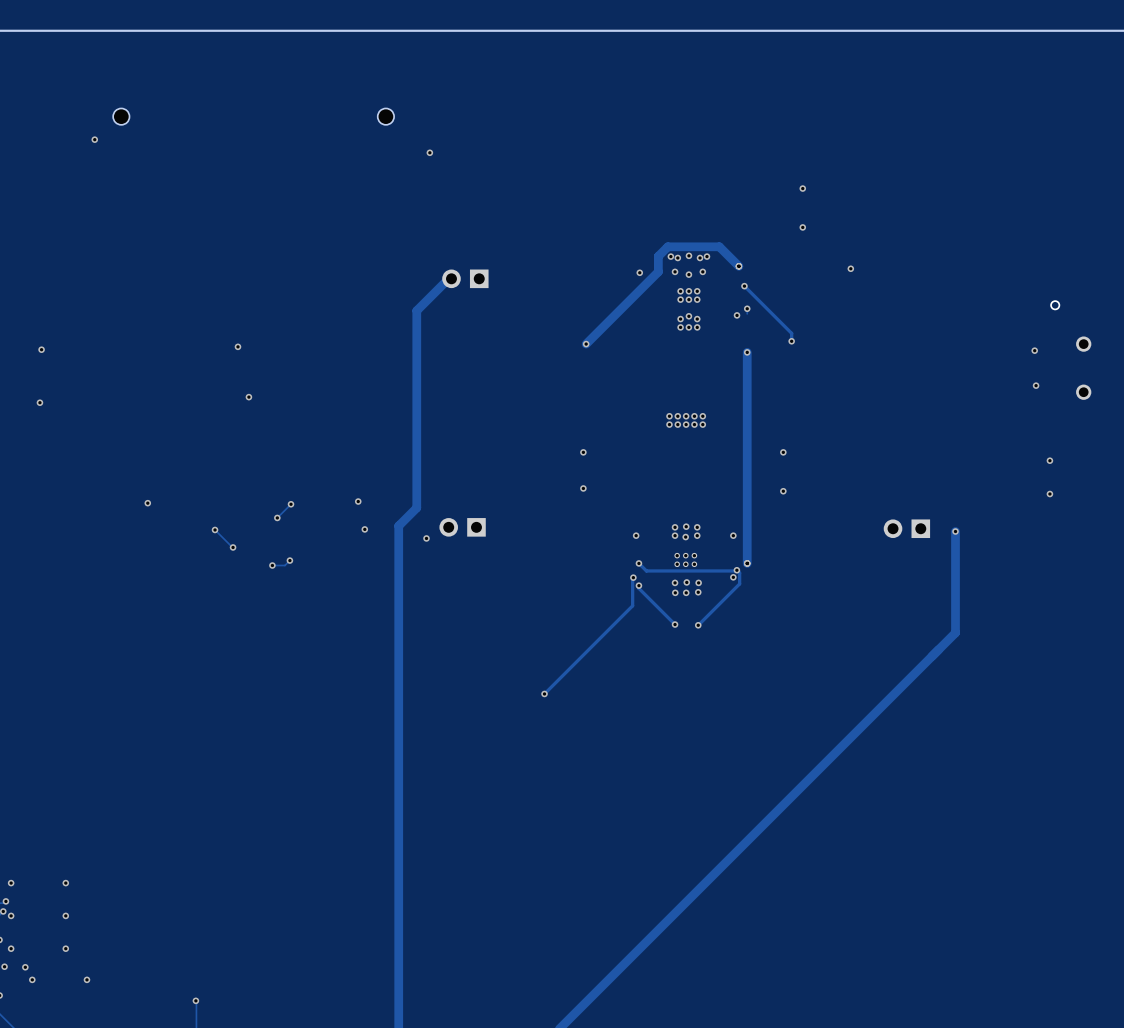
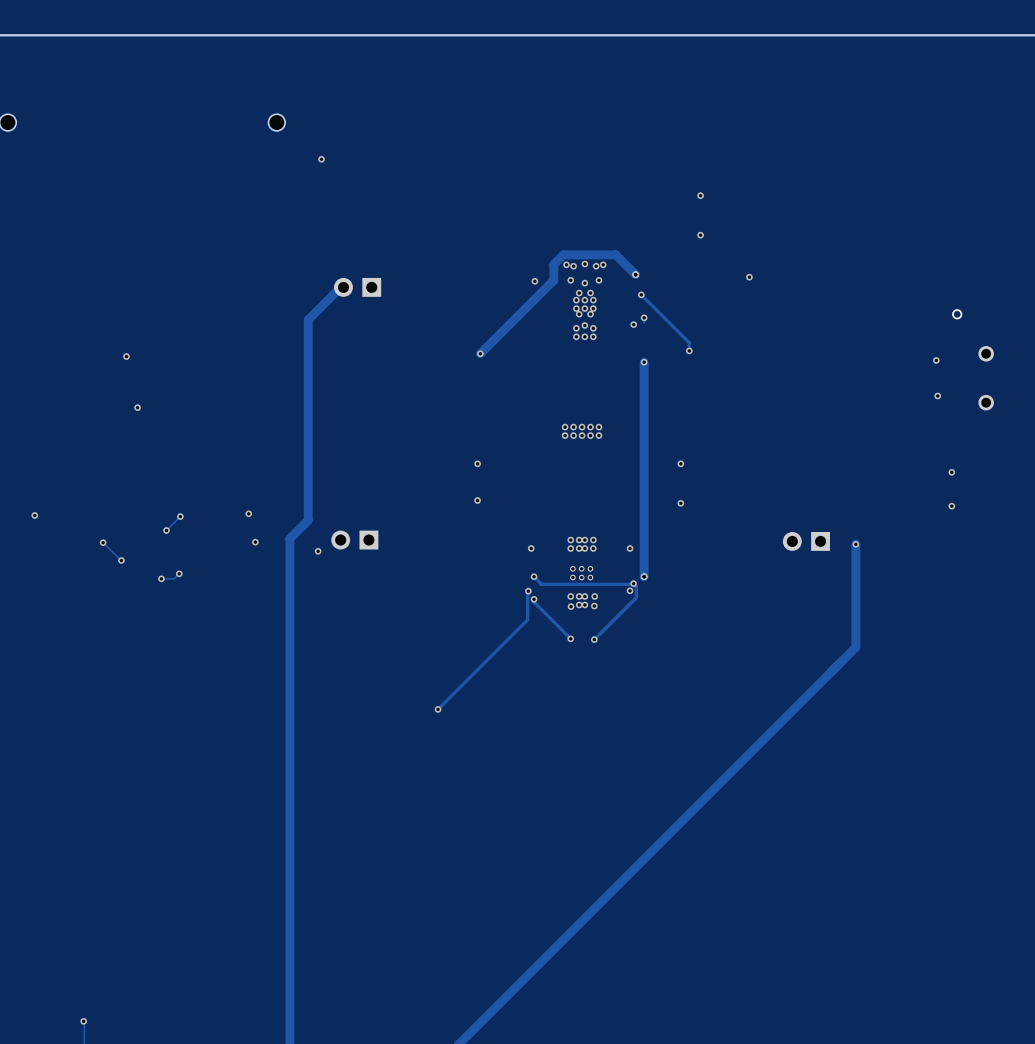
via: none -> (579, 293)
via: none -> (590, 293)
via: none -> (579, 314)
via: none -> (590, 314)
via: (686, 526) -> none
via: none -> (579, 540)
via: none -> (584, 540)
via: none -> (579, 548)
via: none -> (584, 548)
via: (685, 537) -> none
via: none -> (579, 596)
via: (686, 582) -> none
via: none -> (584, 596)
via: none -> (579, 604)
via: none -> (584, 604)
via: (686, 592) -> none

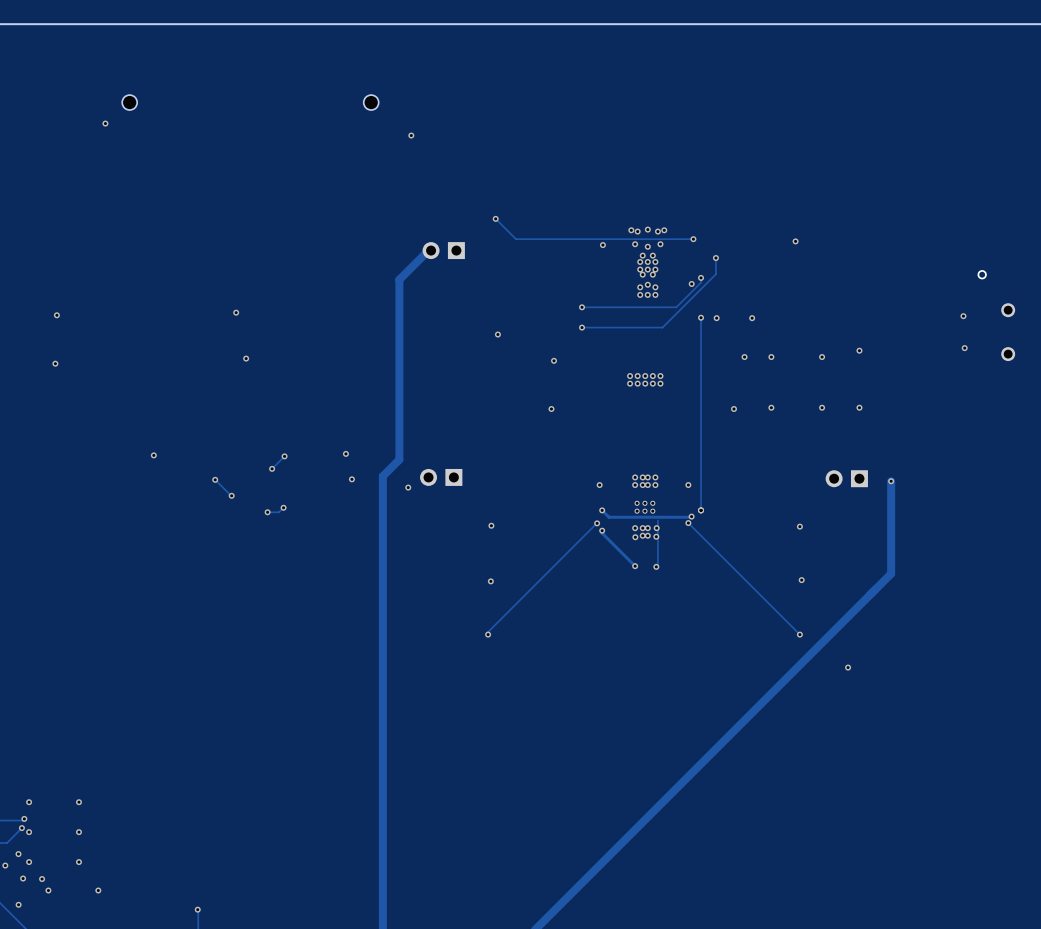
via: (700, 195) -> none
via: (700, 235) -> none
via: none -> (495, 218)
track: (635, 274) (615, 254) (563, 254) (553, 264) (553, 280) (480, 353) -> (693, 239) (515, 239) (495, 218)
track: (641, 294) (689, 342) (689, 350) -> none
via position: (641, 294) -> (715, 258)
track: none -> (715, 258) (715, 274) (662, 327) (582, 327)
track: none -> (701, 282) (676, 307) (582, 307)
via: none -> (582, 307)
via: (689, 350) -> none
via: (480, 353) -> none
track width: thick (644, 362) (644, 576) -> thin (701, 317) (701, 510)
via: none -> (716, 318)
via: none -> (752, 318)
via: none -> (582, 327)
via: none -> (497, 334)
via: none -> (859, 350)
via: none -> (744, 357)
via: none -> (771, 357)
via: none -> (822, 357)
via: none -> (554, 360)
via: none -> (771, 407)
via: none -> (822, 407)
via: none -> (859, 407)
via: (951, 472) -> none
via: (477, 500) -> none
via: (680, 503) -> none
via: (951, 506) -> none
track: (633, 583) (636, 586) (636, 597) (594, 639) -> none
track: none -> (657, 520) (657, 565)
track: none -> (688, 523) (799, 634)
track: (528, 591) (527, 619) (438, 709) -> (597, 523) (488, 632) (488, 634)
via: none -> (491, 525)
via: none -> (799, 526)
via: none -> (801, 580)
via: none -> (490, 581)
via: (438, 709) -> none
via: none -> (488, 634)
via: none -> (799, 634)
via: none -> (848, 667)

